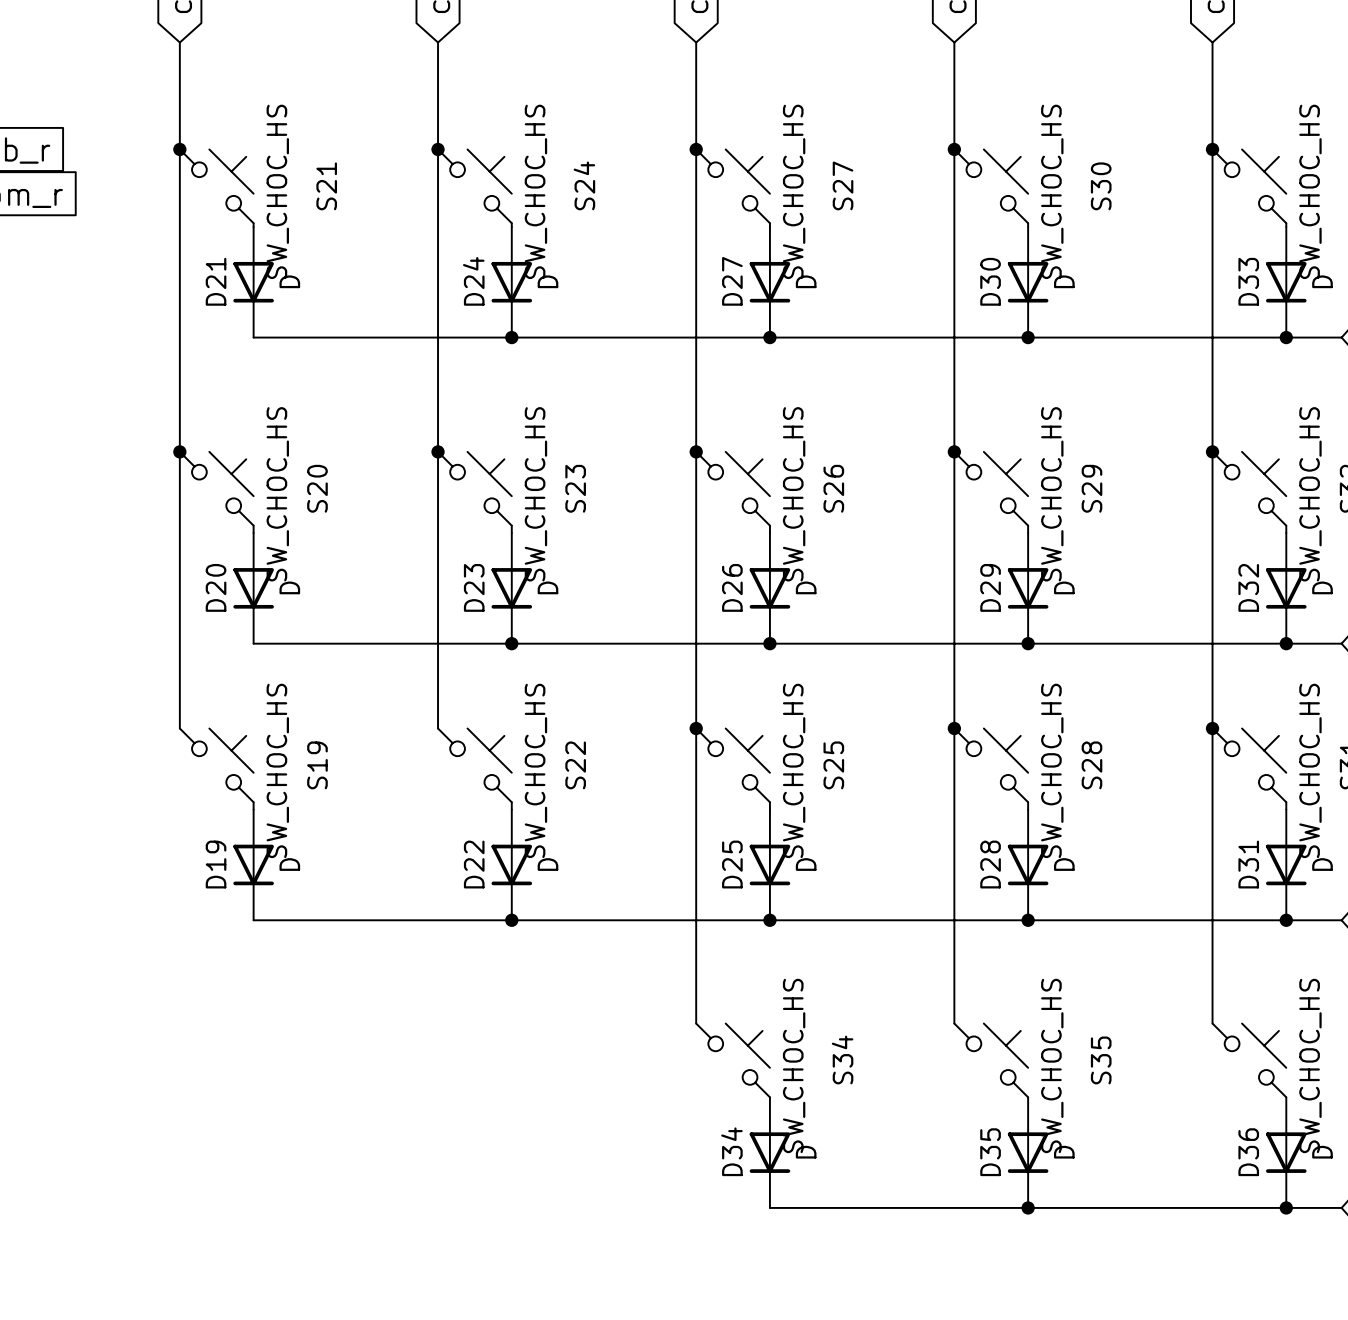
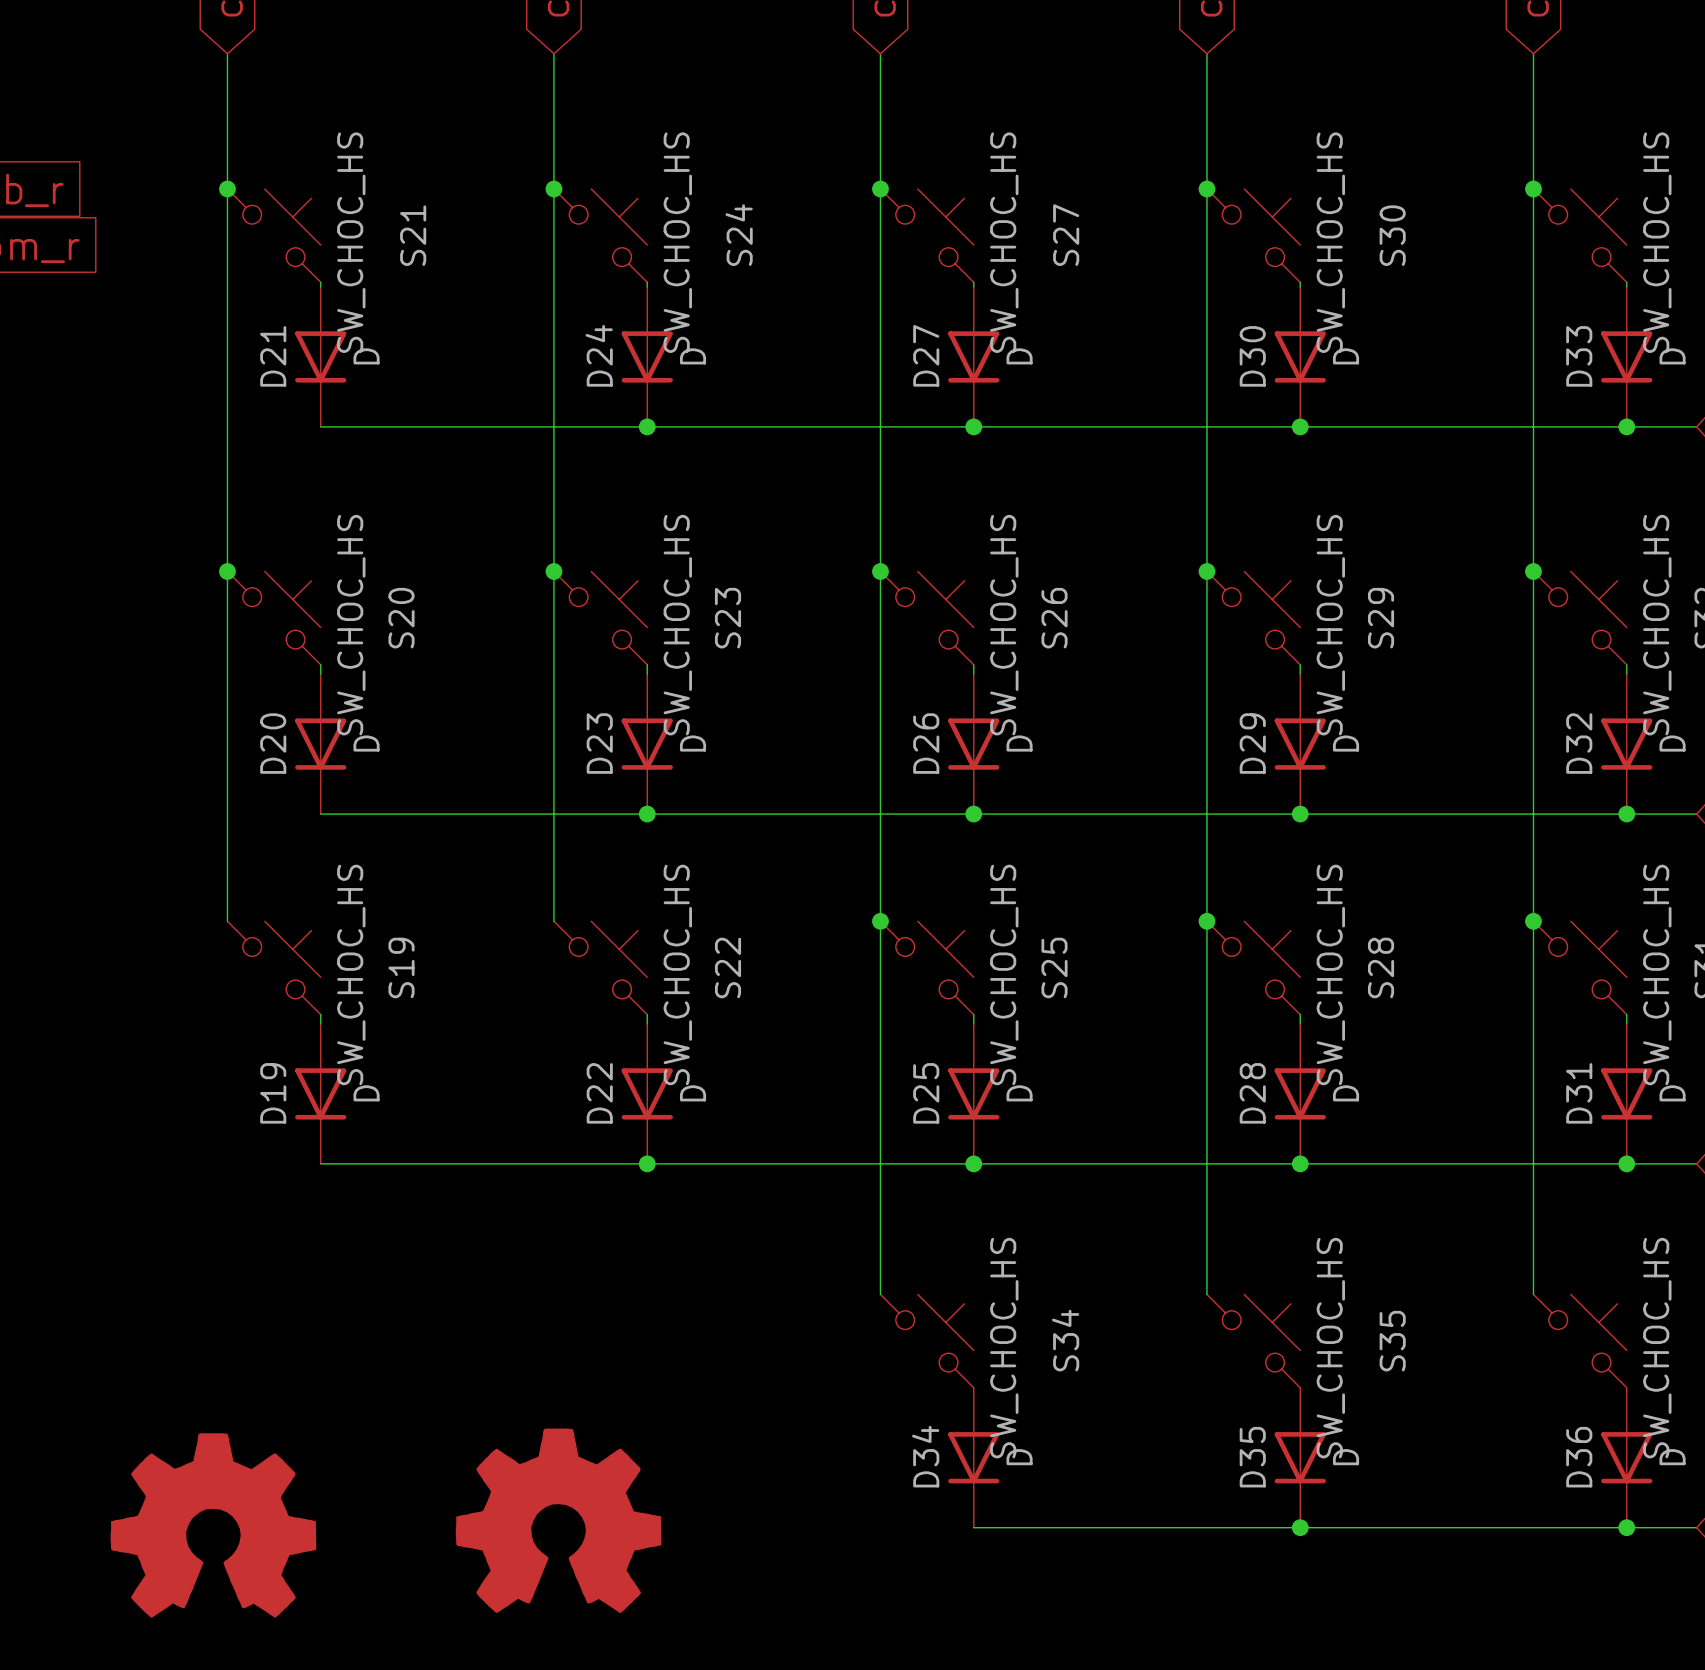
part: none -> (558, 1520)
part: none -> (213, 1525)

